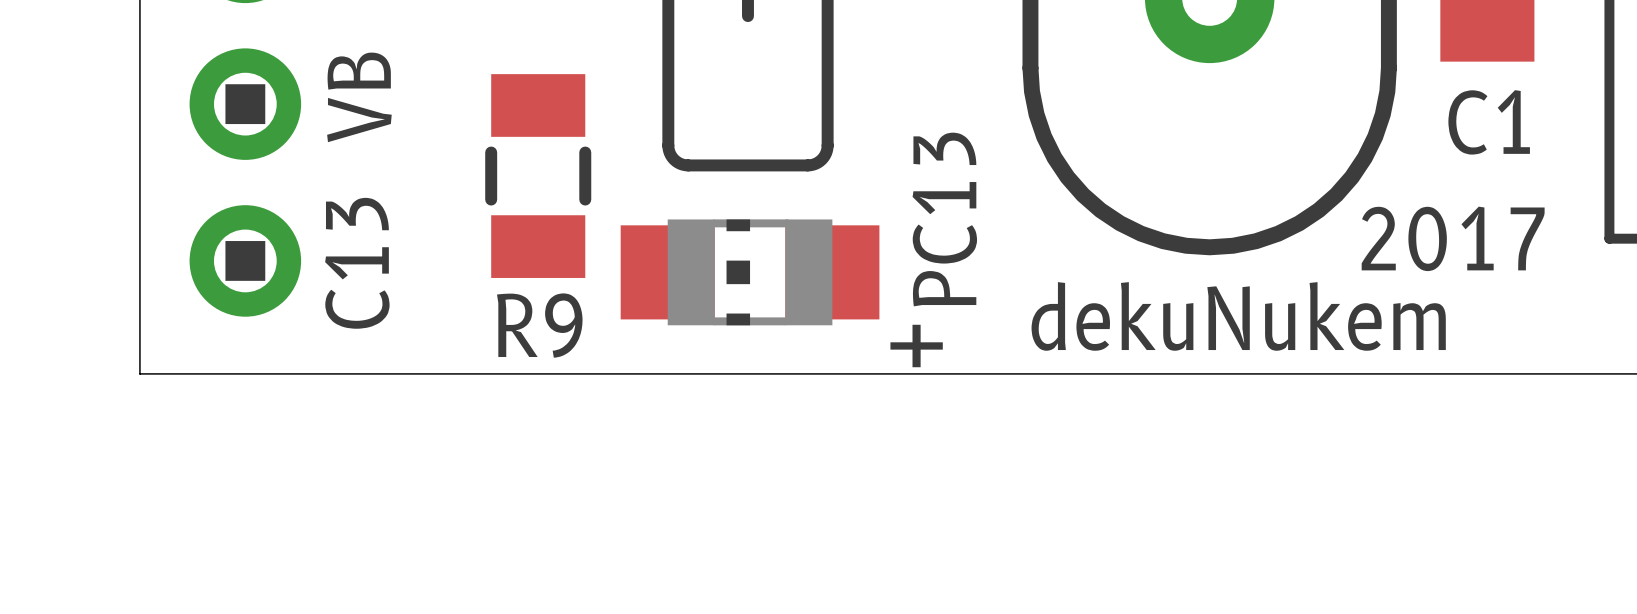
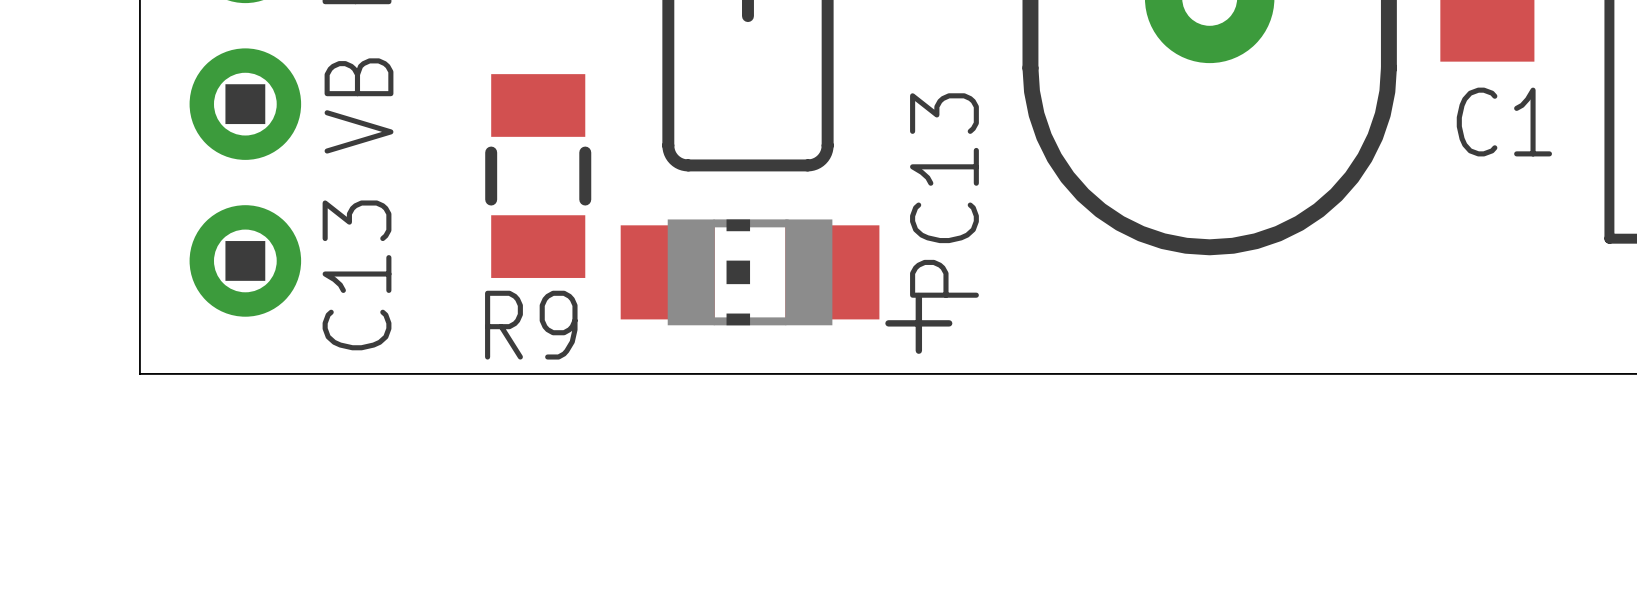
text: 2017 (1453, 238) -> none
text: dekuNukem (1238, 316) -> none

